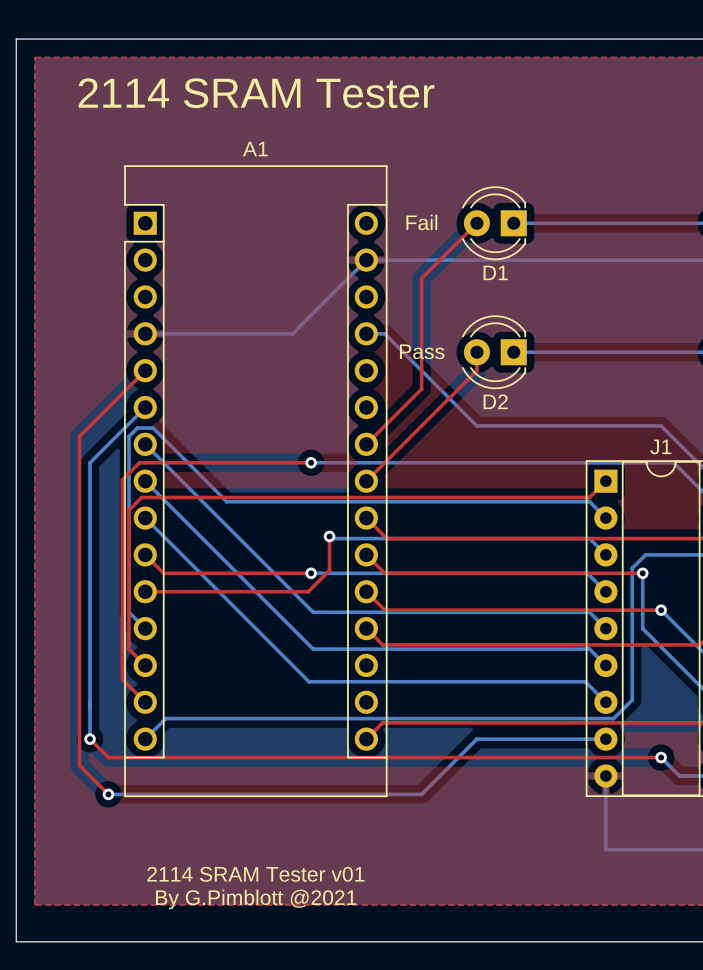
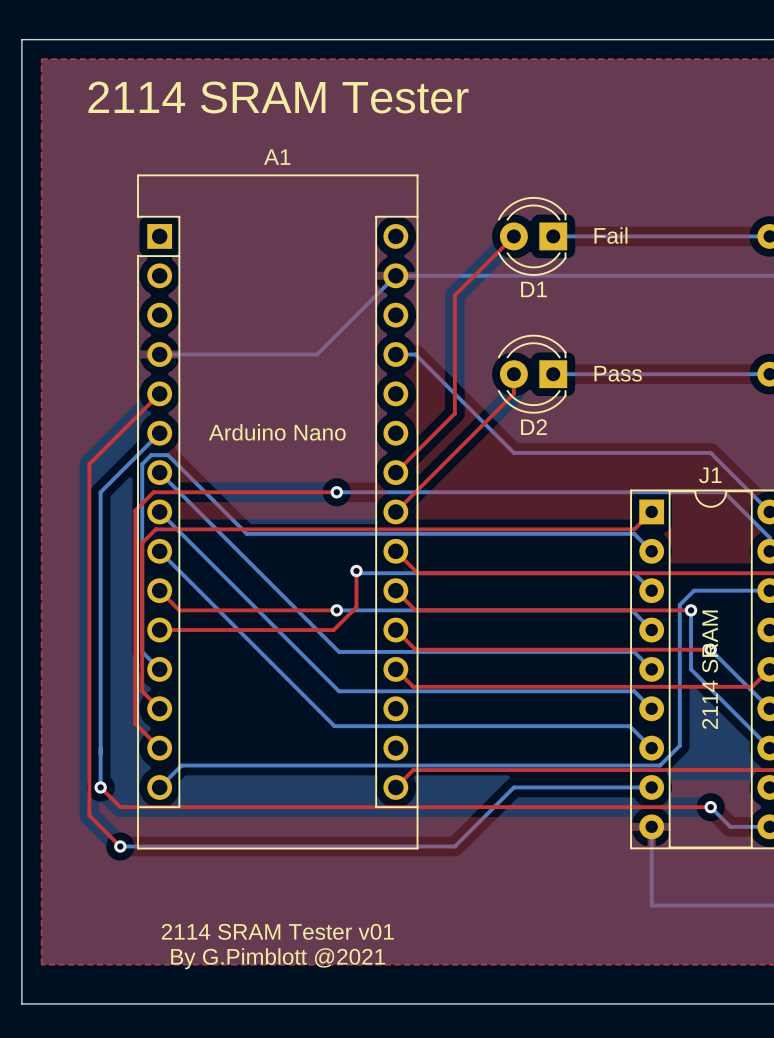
text position: Fail (421, 222) -> Fail (610, 235)
text position: Pass (422, 351) -> Pass (618, 373)
text: none -> Arduino Nano (277, 432)
text: none -> 2114 SRAM (710, 669)

